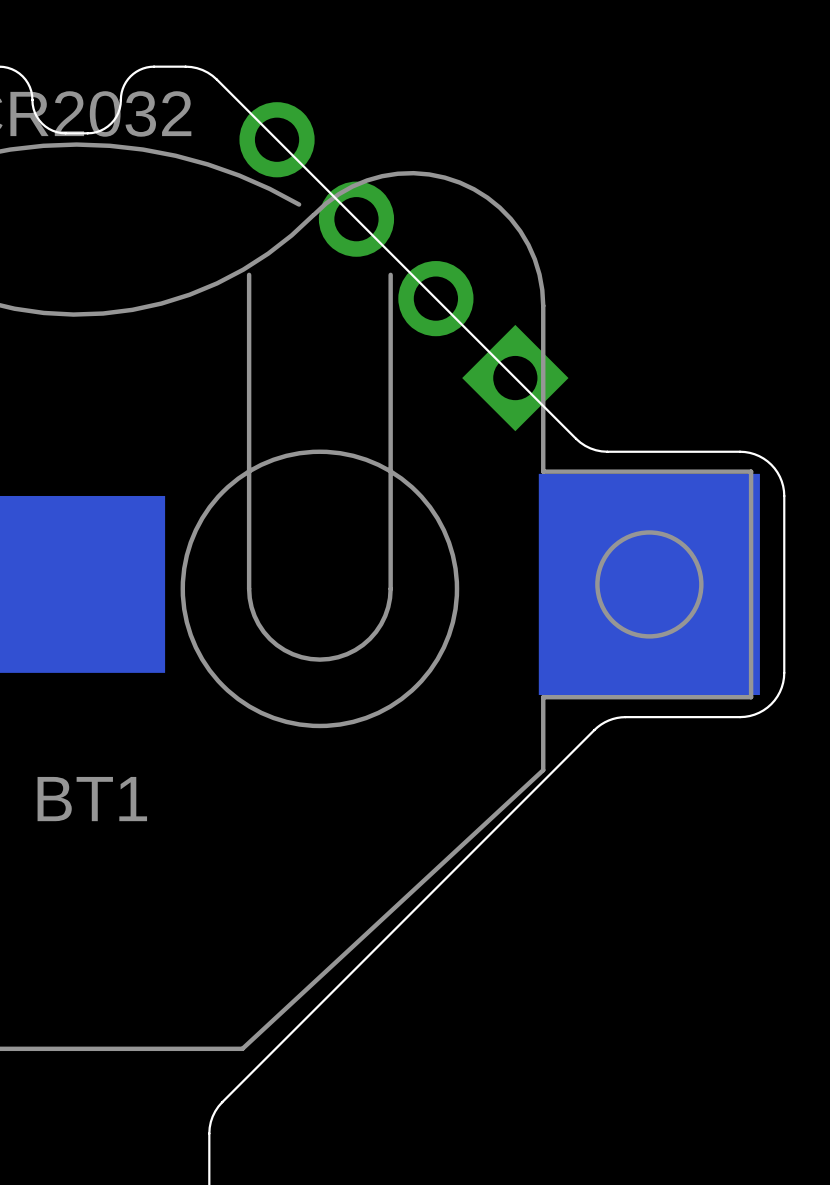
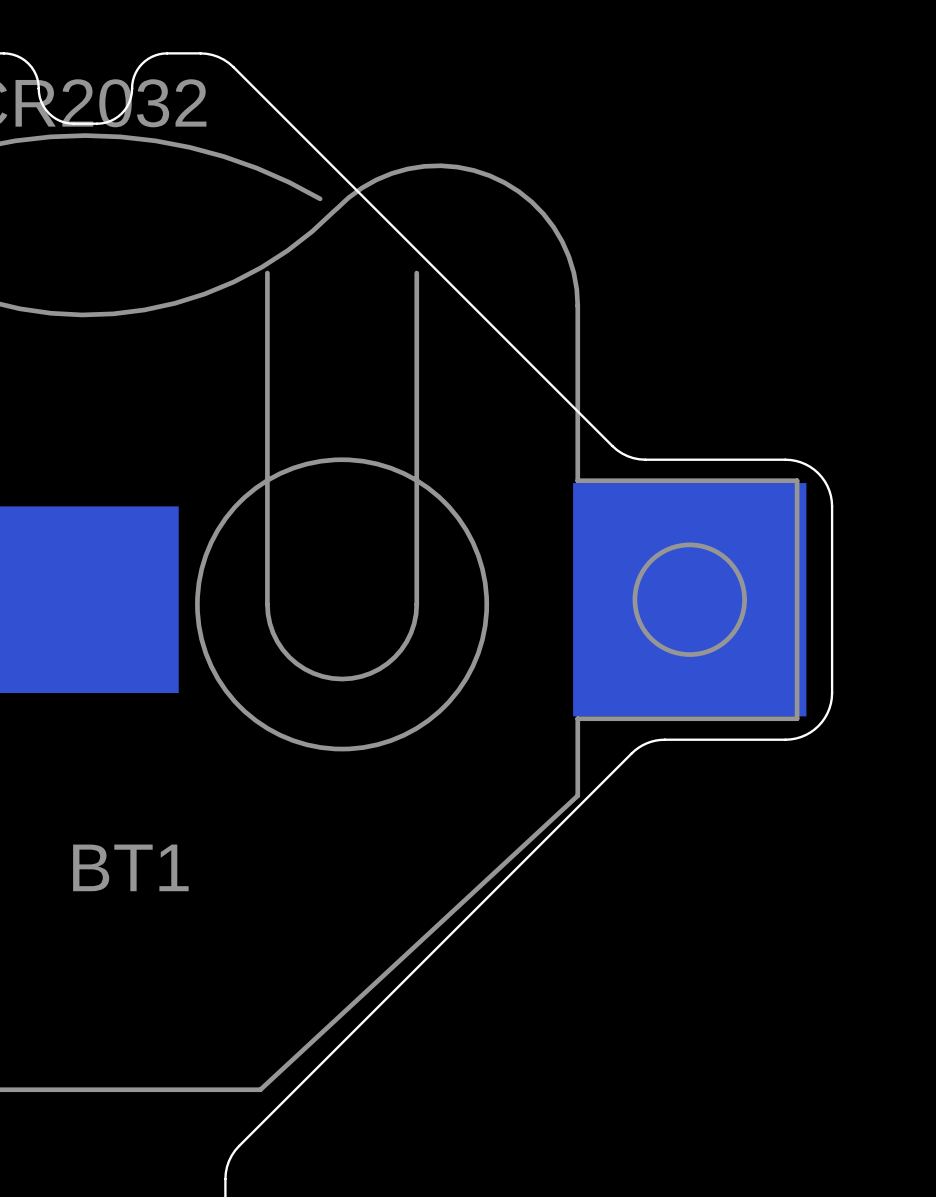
part: (403, 266) -> none
BT1 name position: BT1 (92, 799) -> BT1 (130, 867)

